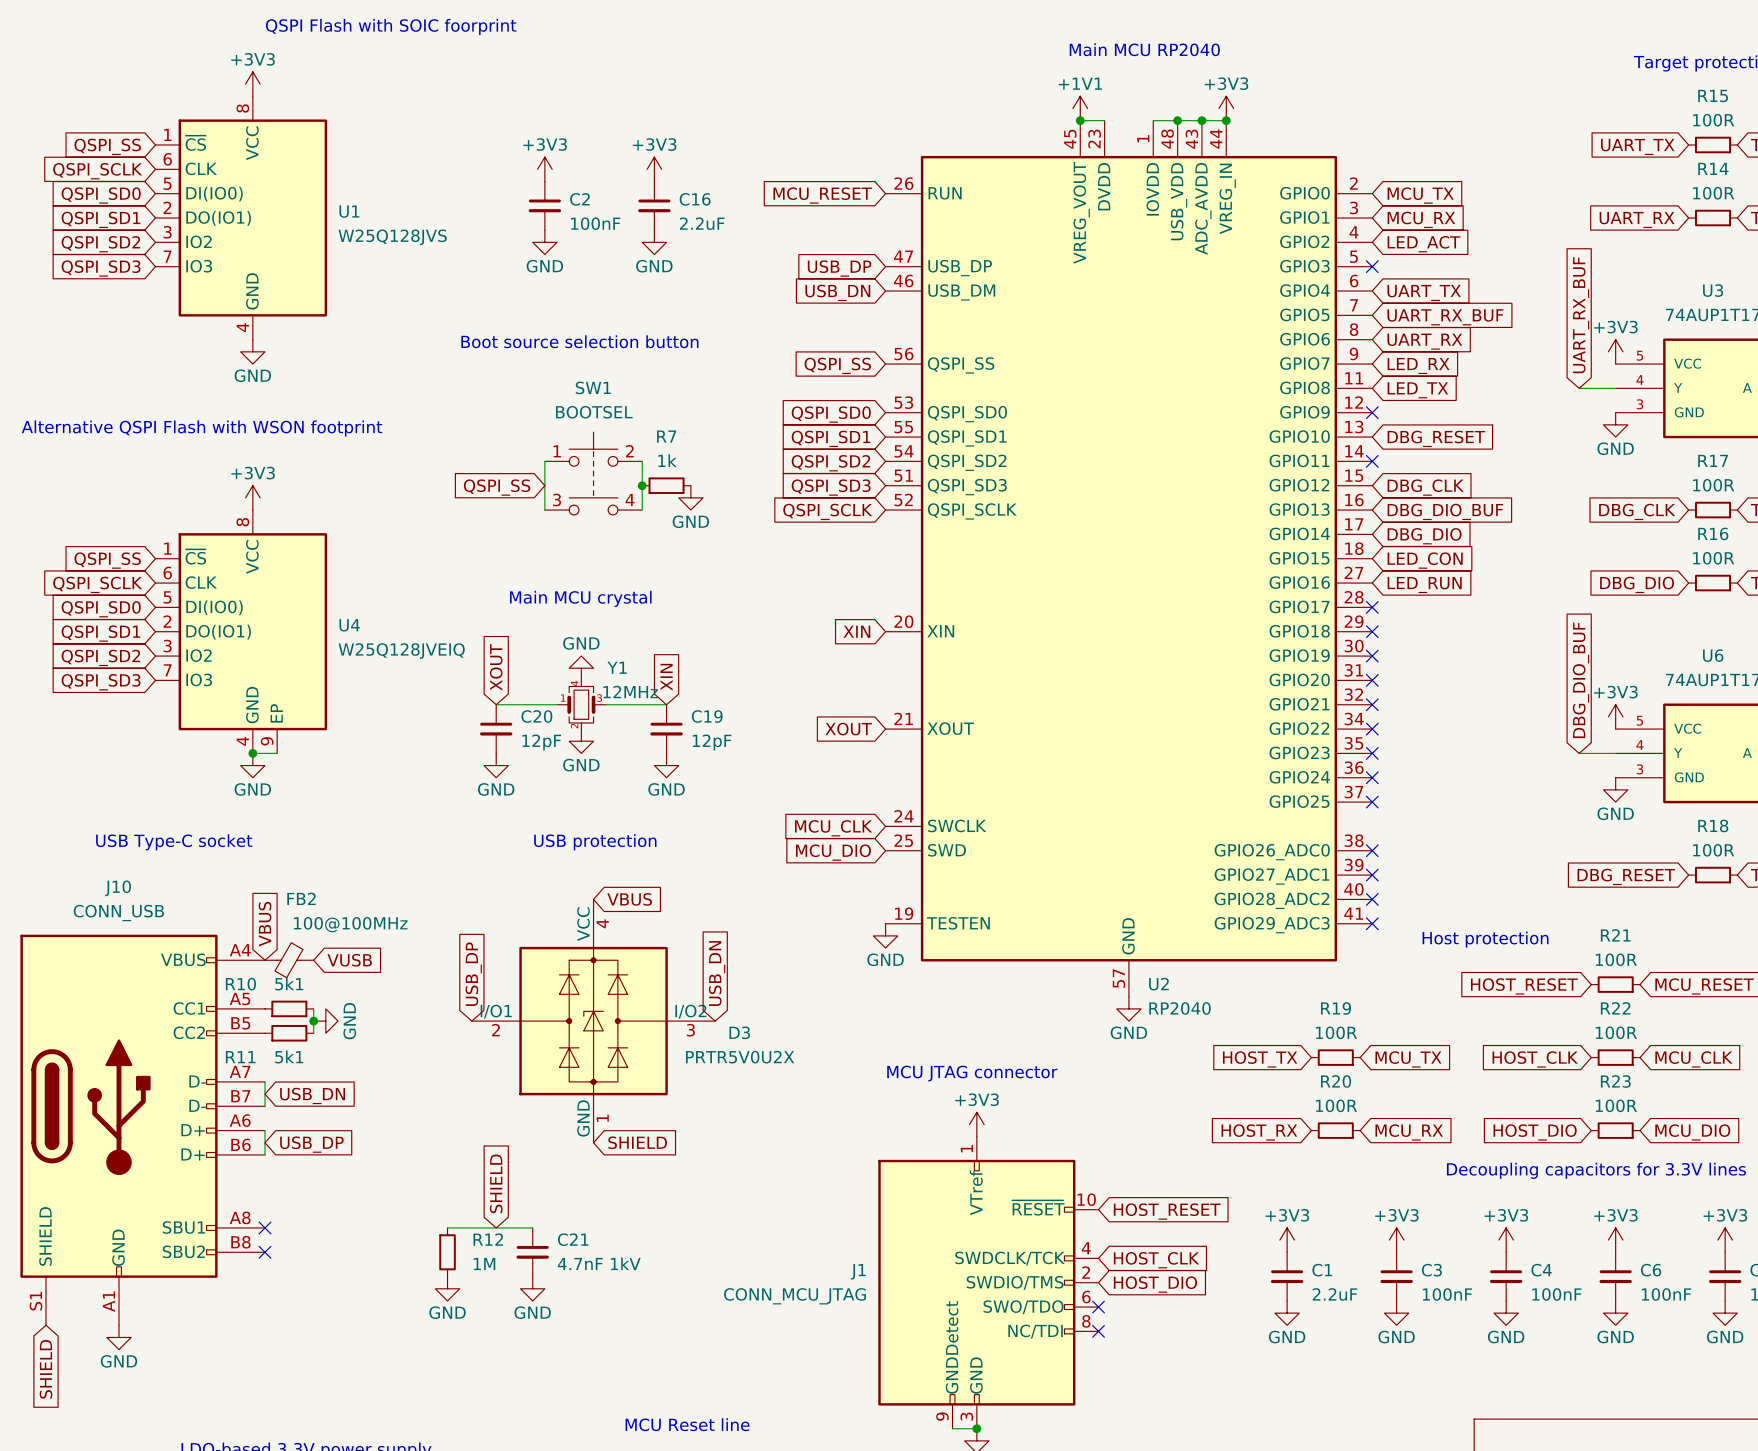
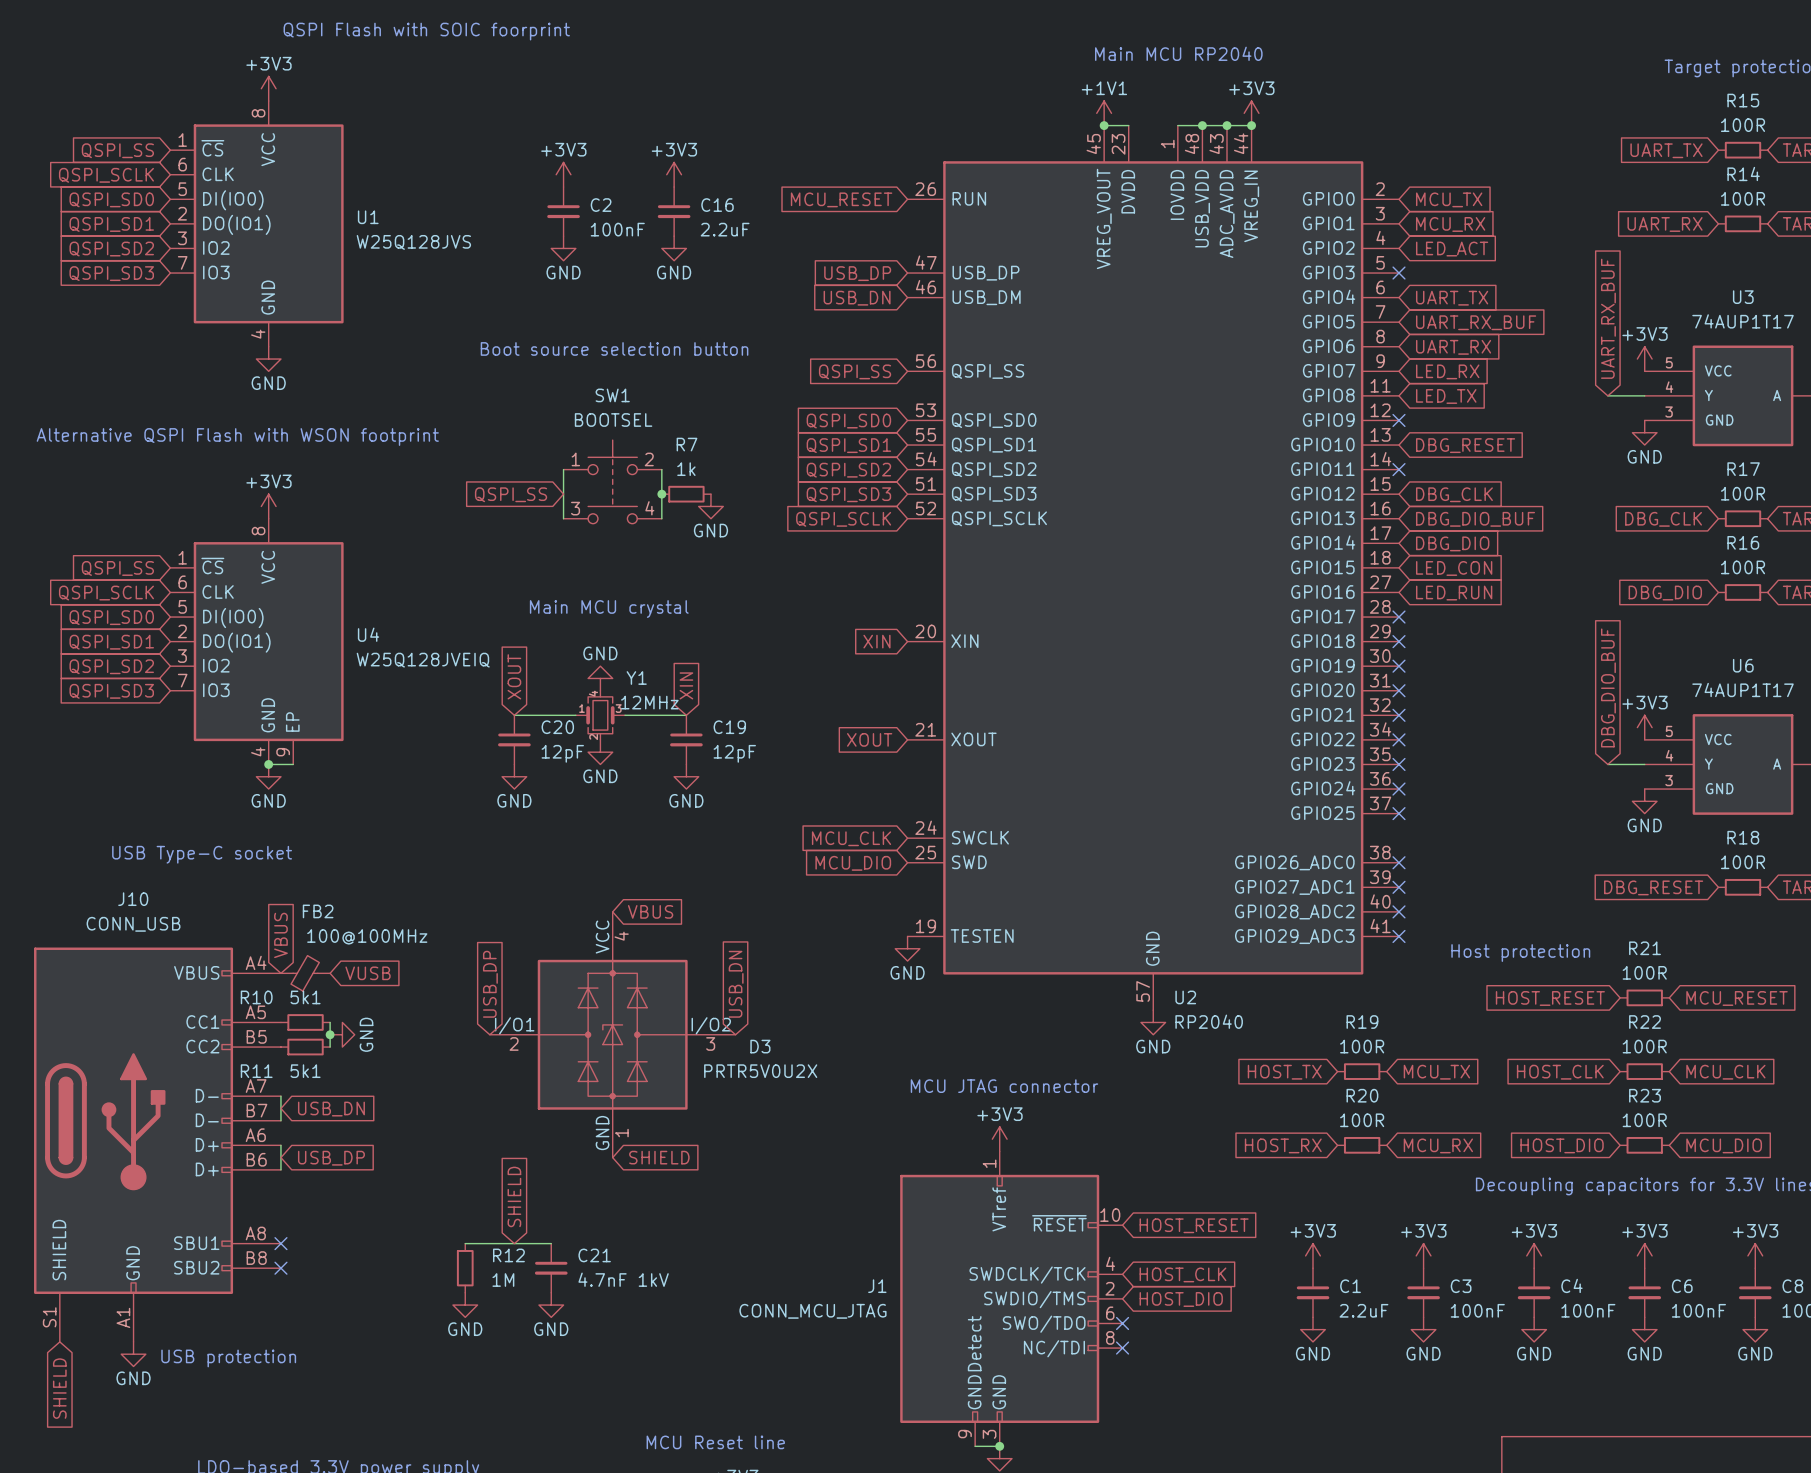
text: USB protection (595, 842) -> none
text: none -> USB protection (228, 1358)

